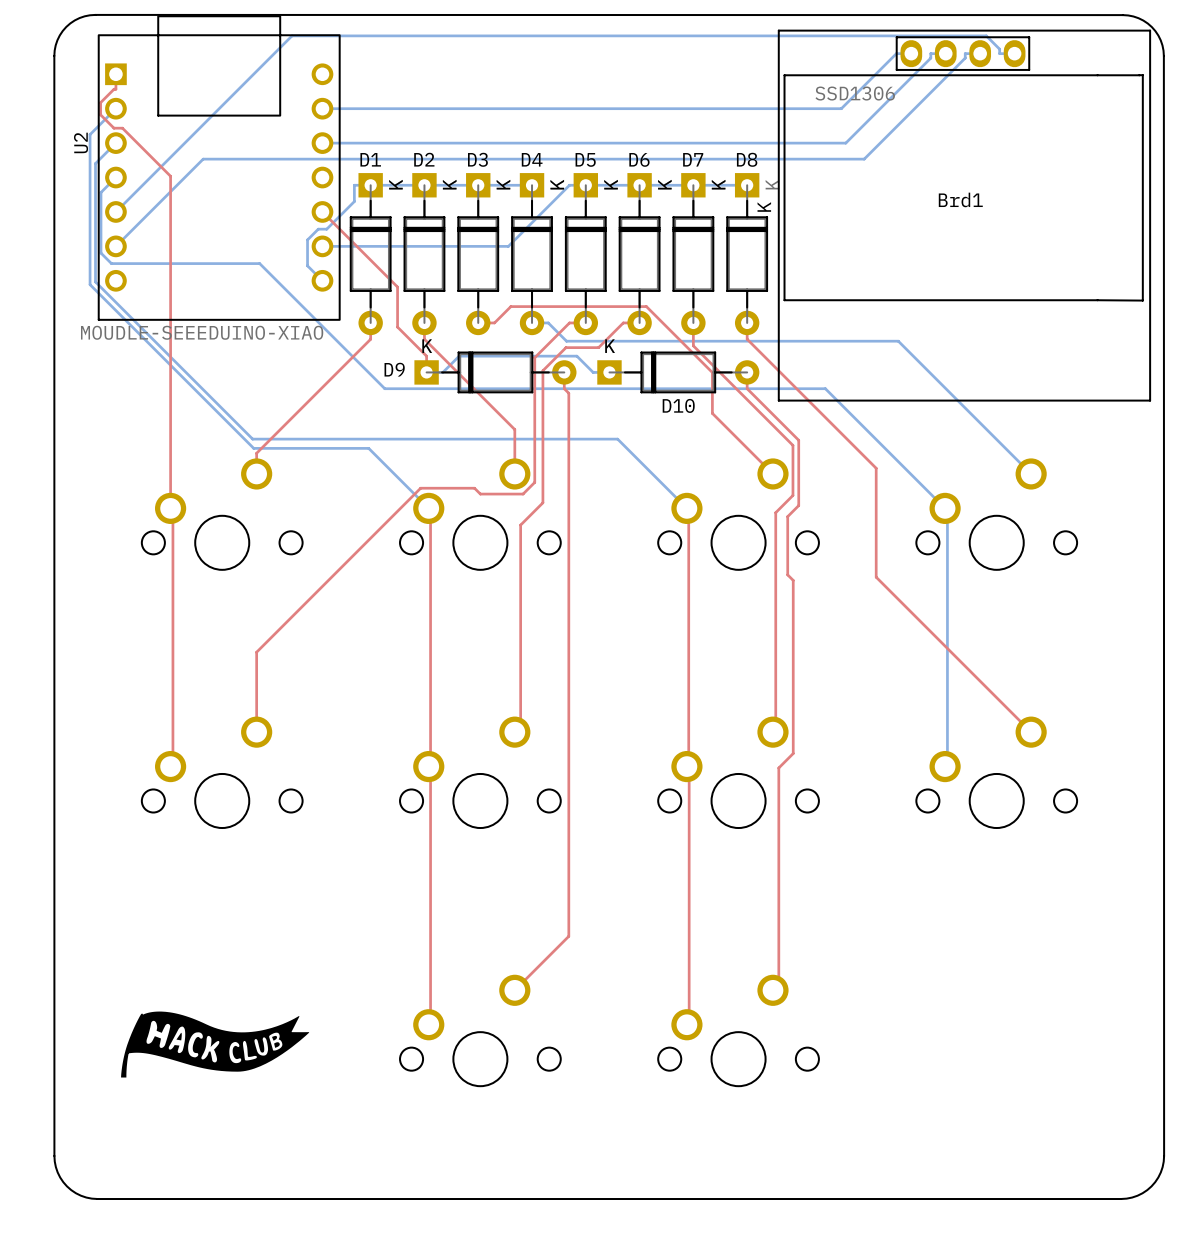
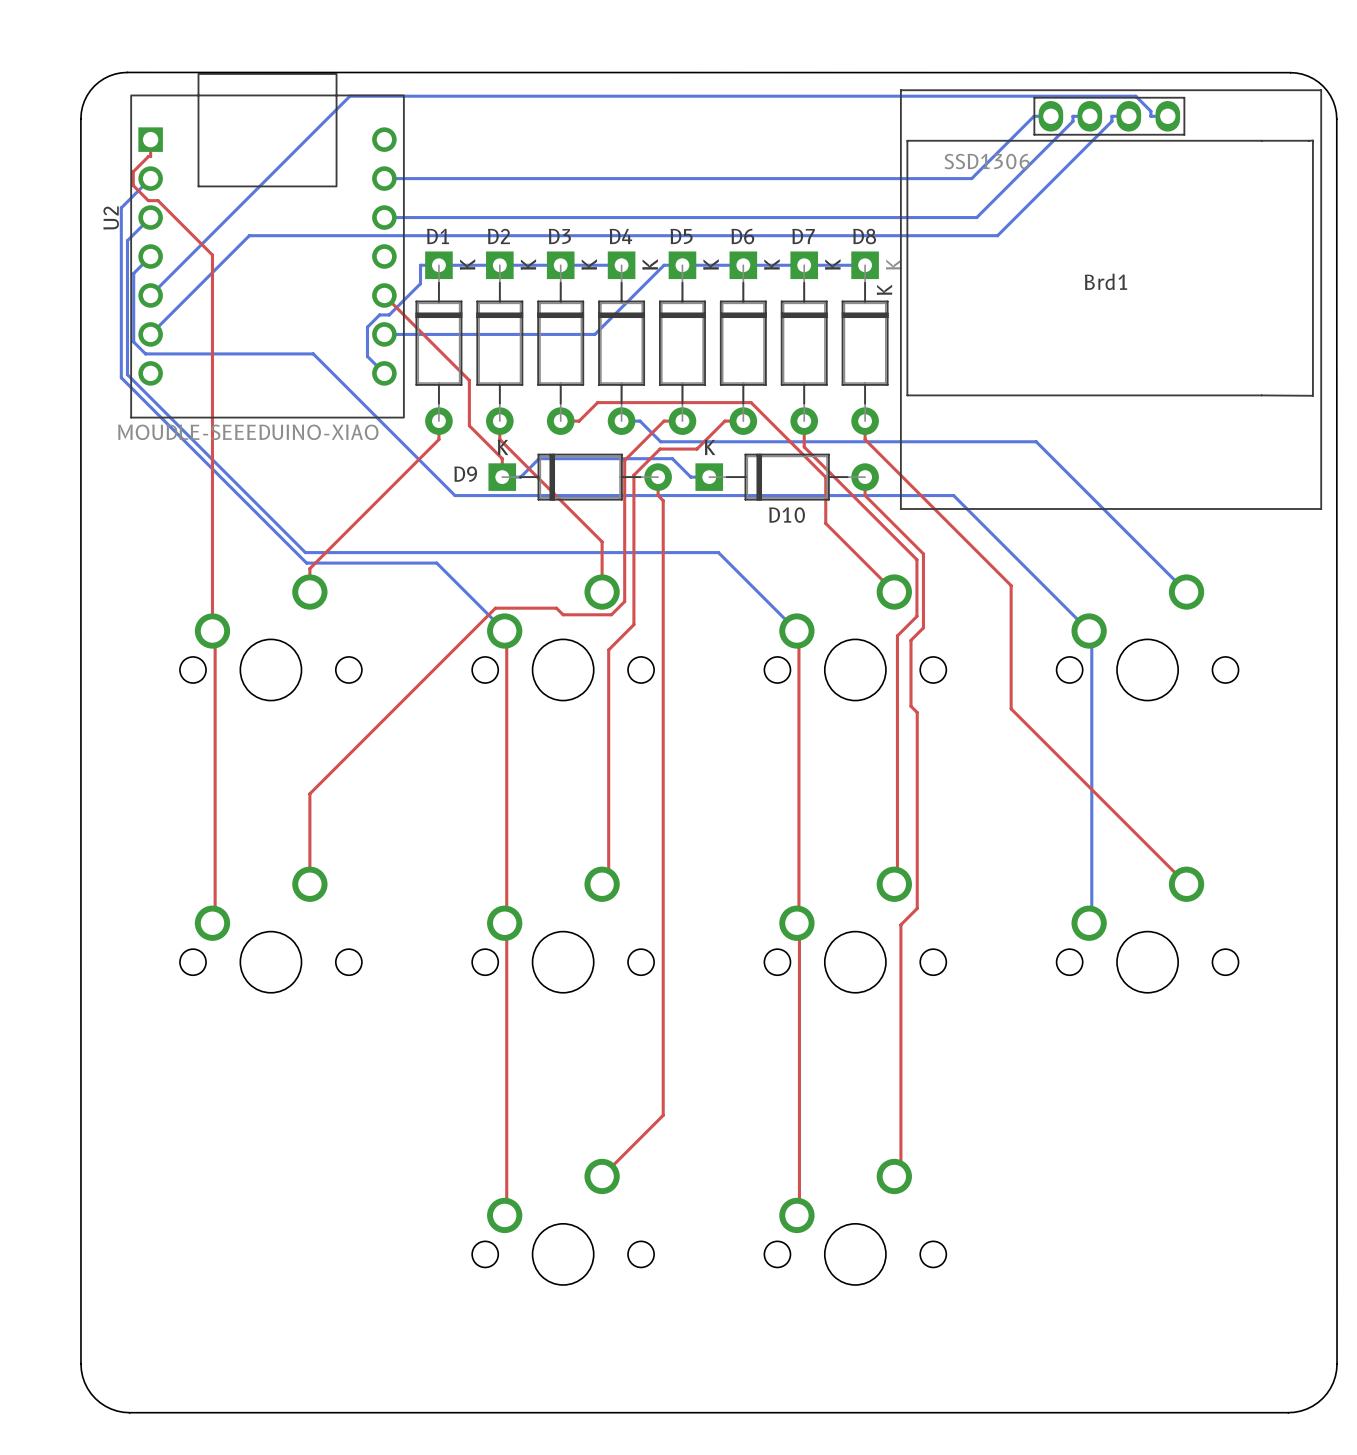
drawing: [121, 1011, 310, 1078] -> none

